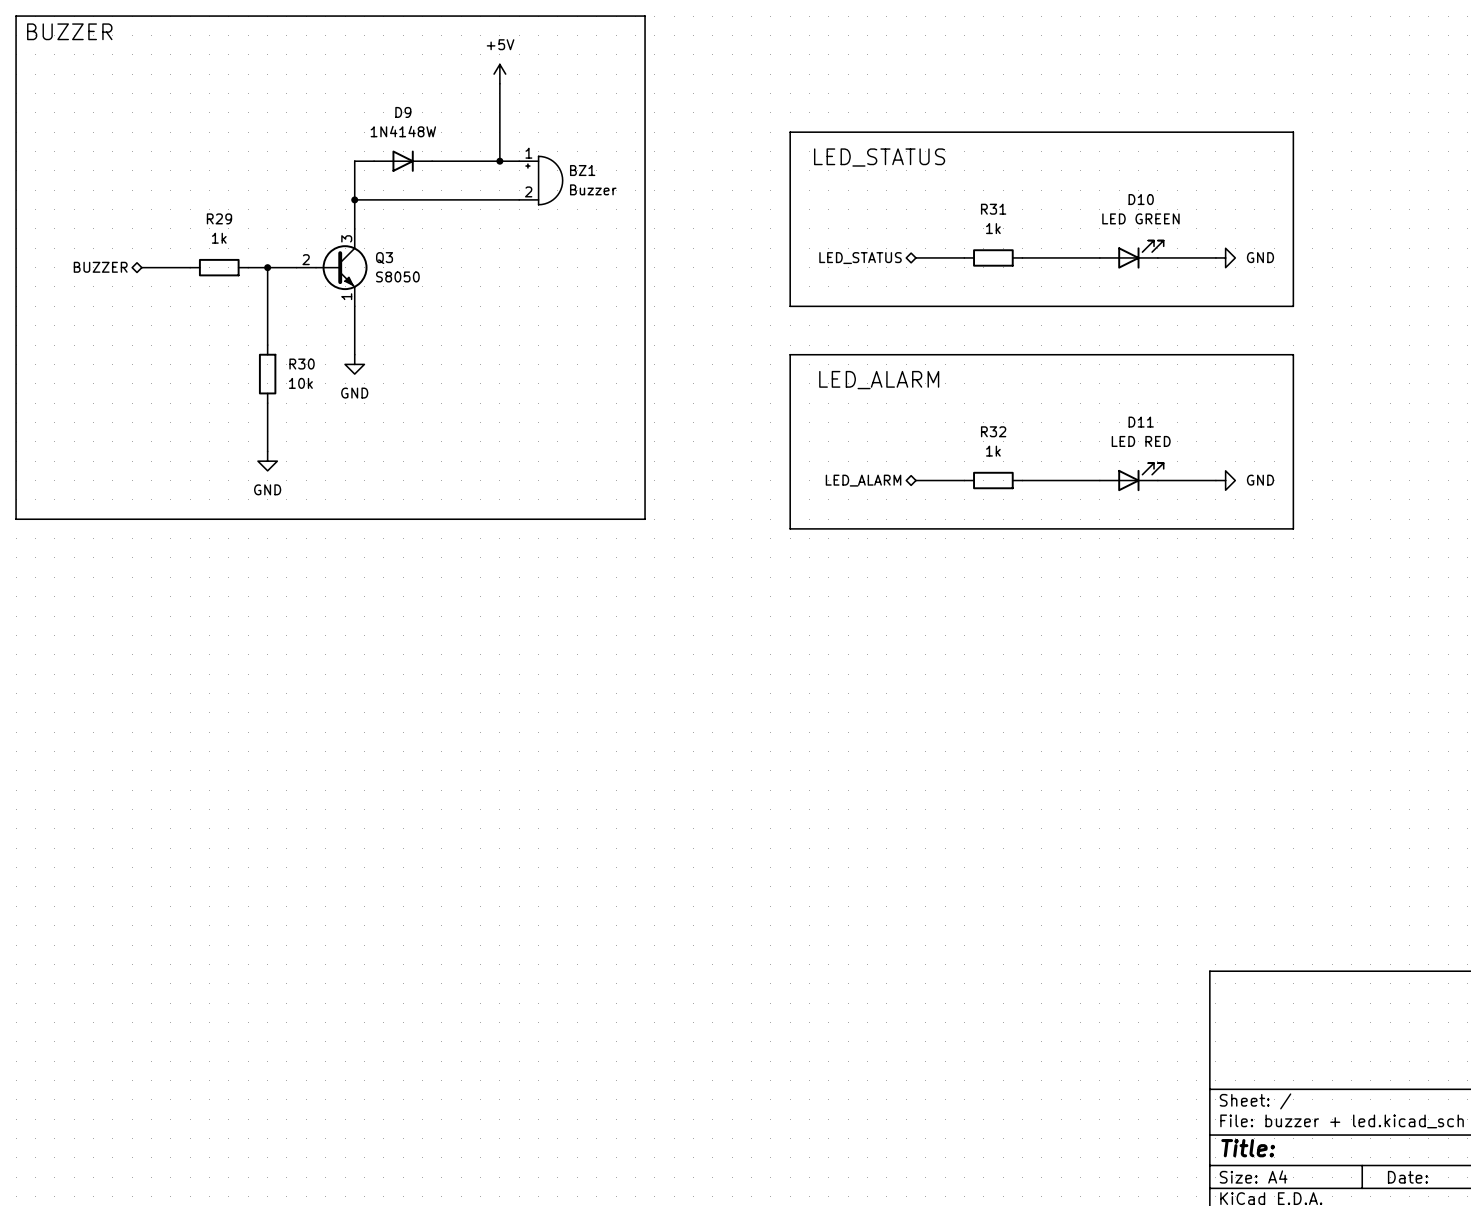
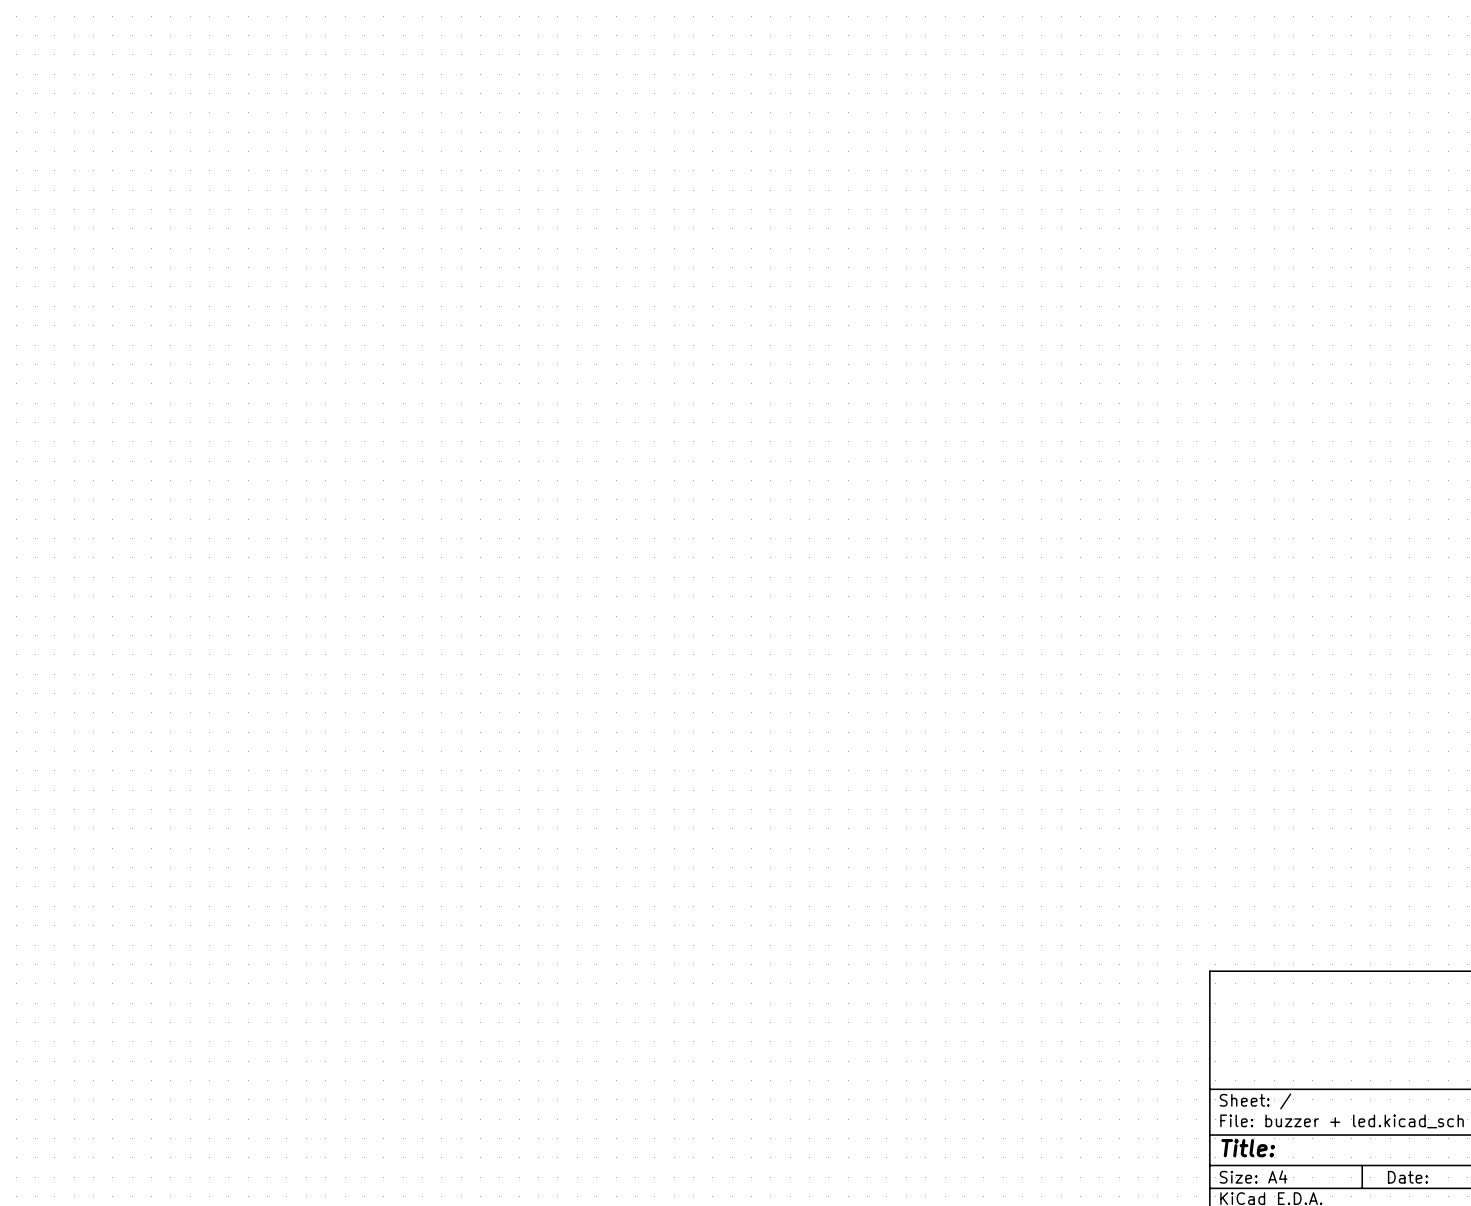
line: (16, 16) (645, 16) (645, 519) (16, 519) (16, 16) -> none
text: BUZZER (69, 31) -> none
power symbol: +5V (499, 74) -> none
wire: (499, 83) (499, 161) -> none
line: (790, 132) (790, 306) (1293, 306) (1293, 132) (790, 132) -> none
text: LED_STATUS (879, 157) -> none
wire: (374, 161) (354, 161) (354, 228) -> none
D9: 1N4148W (403, 161) -> none
wire: (432, 161) (519, 161) -> none
junction: (499, 161) -> none
BZ1: Buzzer (540, 180) -> none
wire: (354, 199) (519, 199) -> none
junction: (354, 199) -> none
D10: LED GREEN (1131, 254) -> none
wire: (915, 257) (964, 257) -> none
R31: 1k (993, 257) -> none
wire: (1022, 257) (1099, 257) -> none
wire: (1157, 257) (1215, 257) -> none
power symbol: GND (1225, 257) -> none
hierarchical label: LED_STATUS (860, 258) -> none
hierarchical label: BUZZER (100, 267) -> none
wire: (141, 267) (190, 267) -> none
R29: 1k (219, 267) -> none
wire: (248, 267) (296, 267) -> none
wire: (267, 267) (267, 345) -> none
junction: (267, 267) -> none
Q3: S8050 (332, 267) -> none
wire: (354, 306) (354, 354) -> none
line: (790, 354) (1293, 354) (1293, 528) (790, 528) (790, 354) -> none
power symbol: GND (354, 364) -> none
R30: 10k (267, 374) -> none
text: LED_ALARM (879, 380) -> none
wire: (267, 403) (267, 451) -> none
power symbol: GND (267, 461) -> none
D11: LED RED (1131, 477) -> none
hierarchical label: LED_ALARM (863, 480) -> none
wire: (915, 480) (964, 480) -> none
R32: 1k (993, 480) -> none
wire: (1022, 480) (1099, 480) -> none
wire: (1157, 480) (1215, 480) -> none
power symbol: GND (1225, 480) -> none

